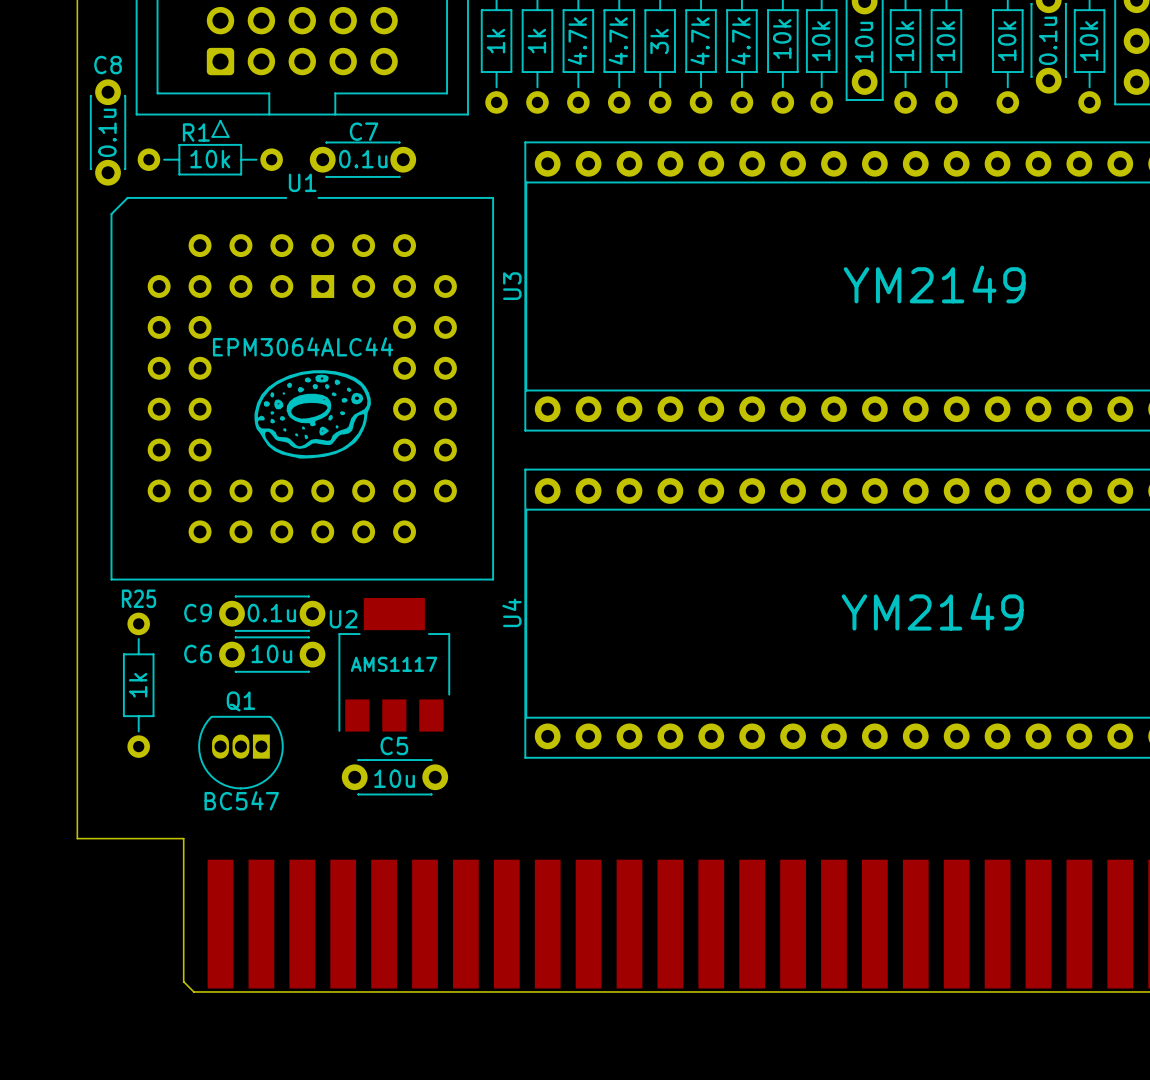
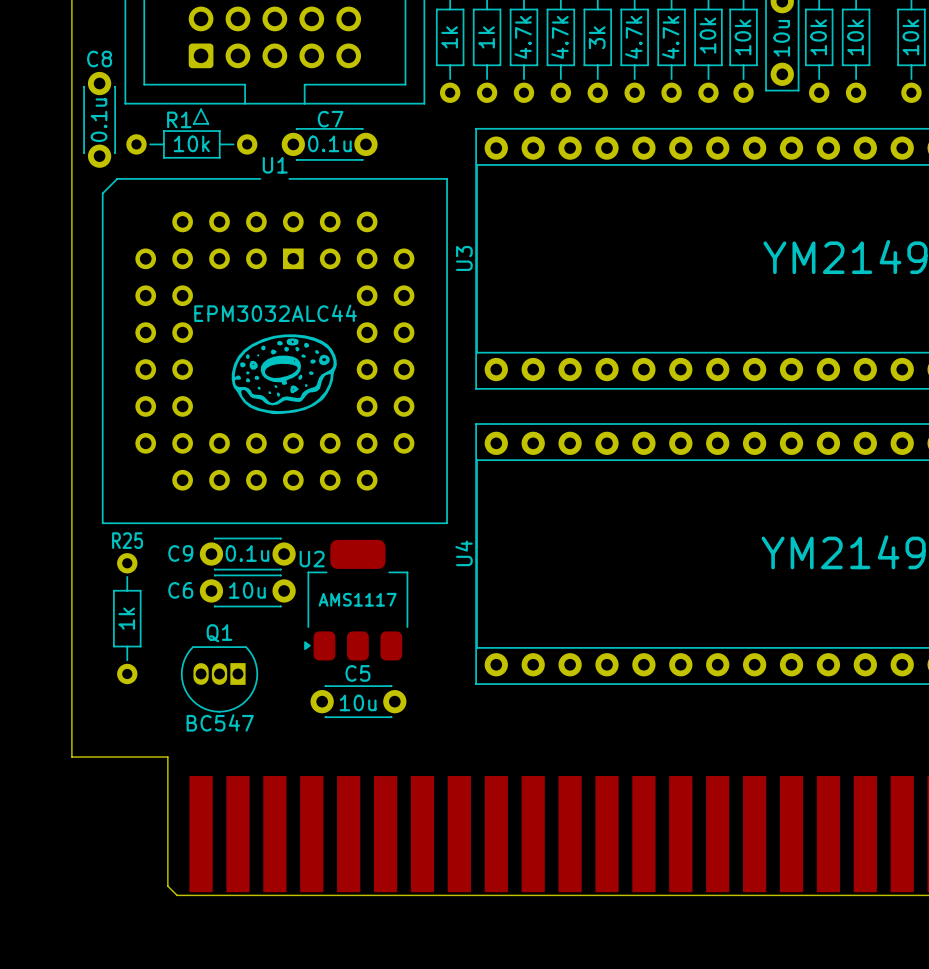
U1 value: EPM3064ALC44 (303, 346) -> EPM3032ALC44 (275, 313)
U2 footprint: [338, 597, 451, 732] -> [304, 539, 409, 661]

